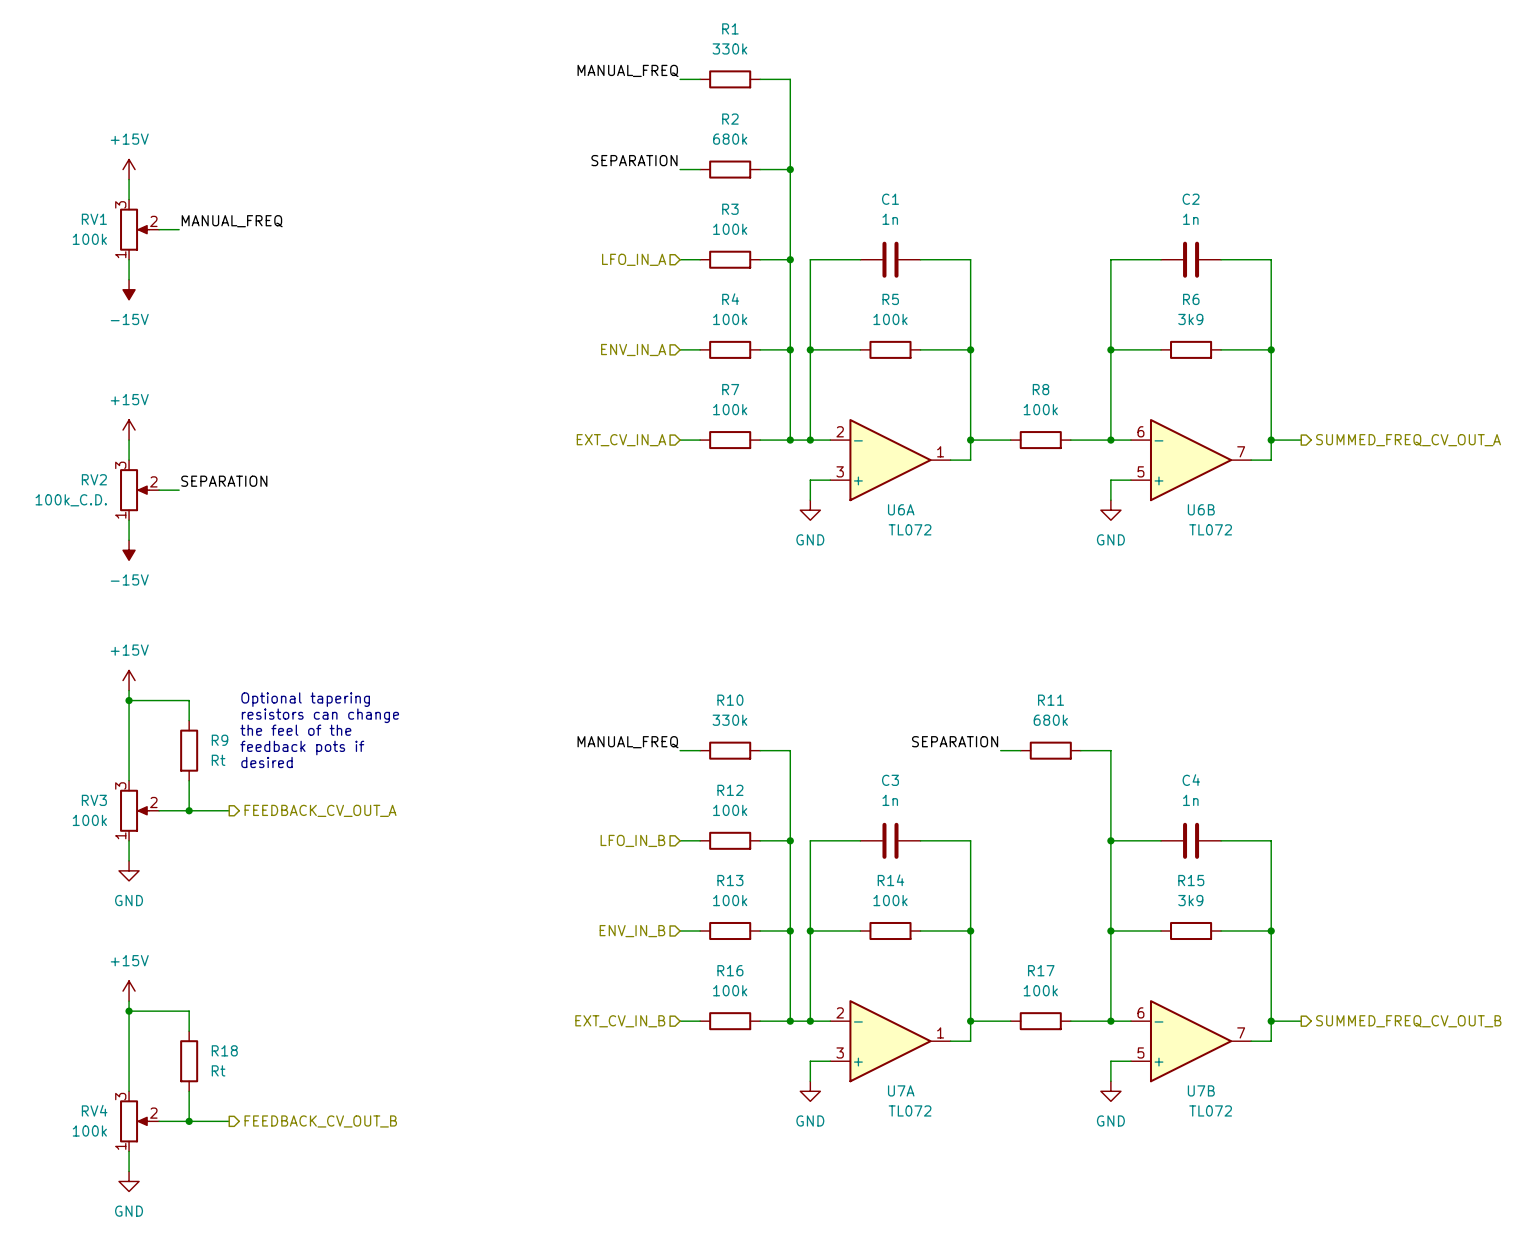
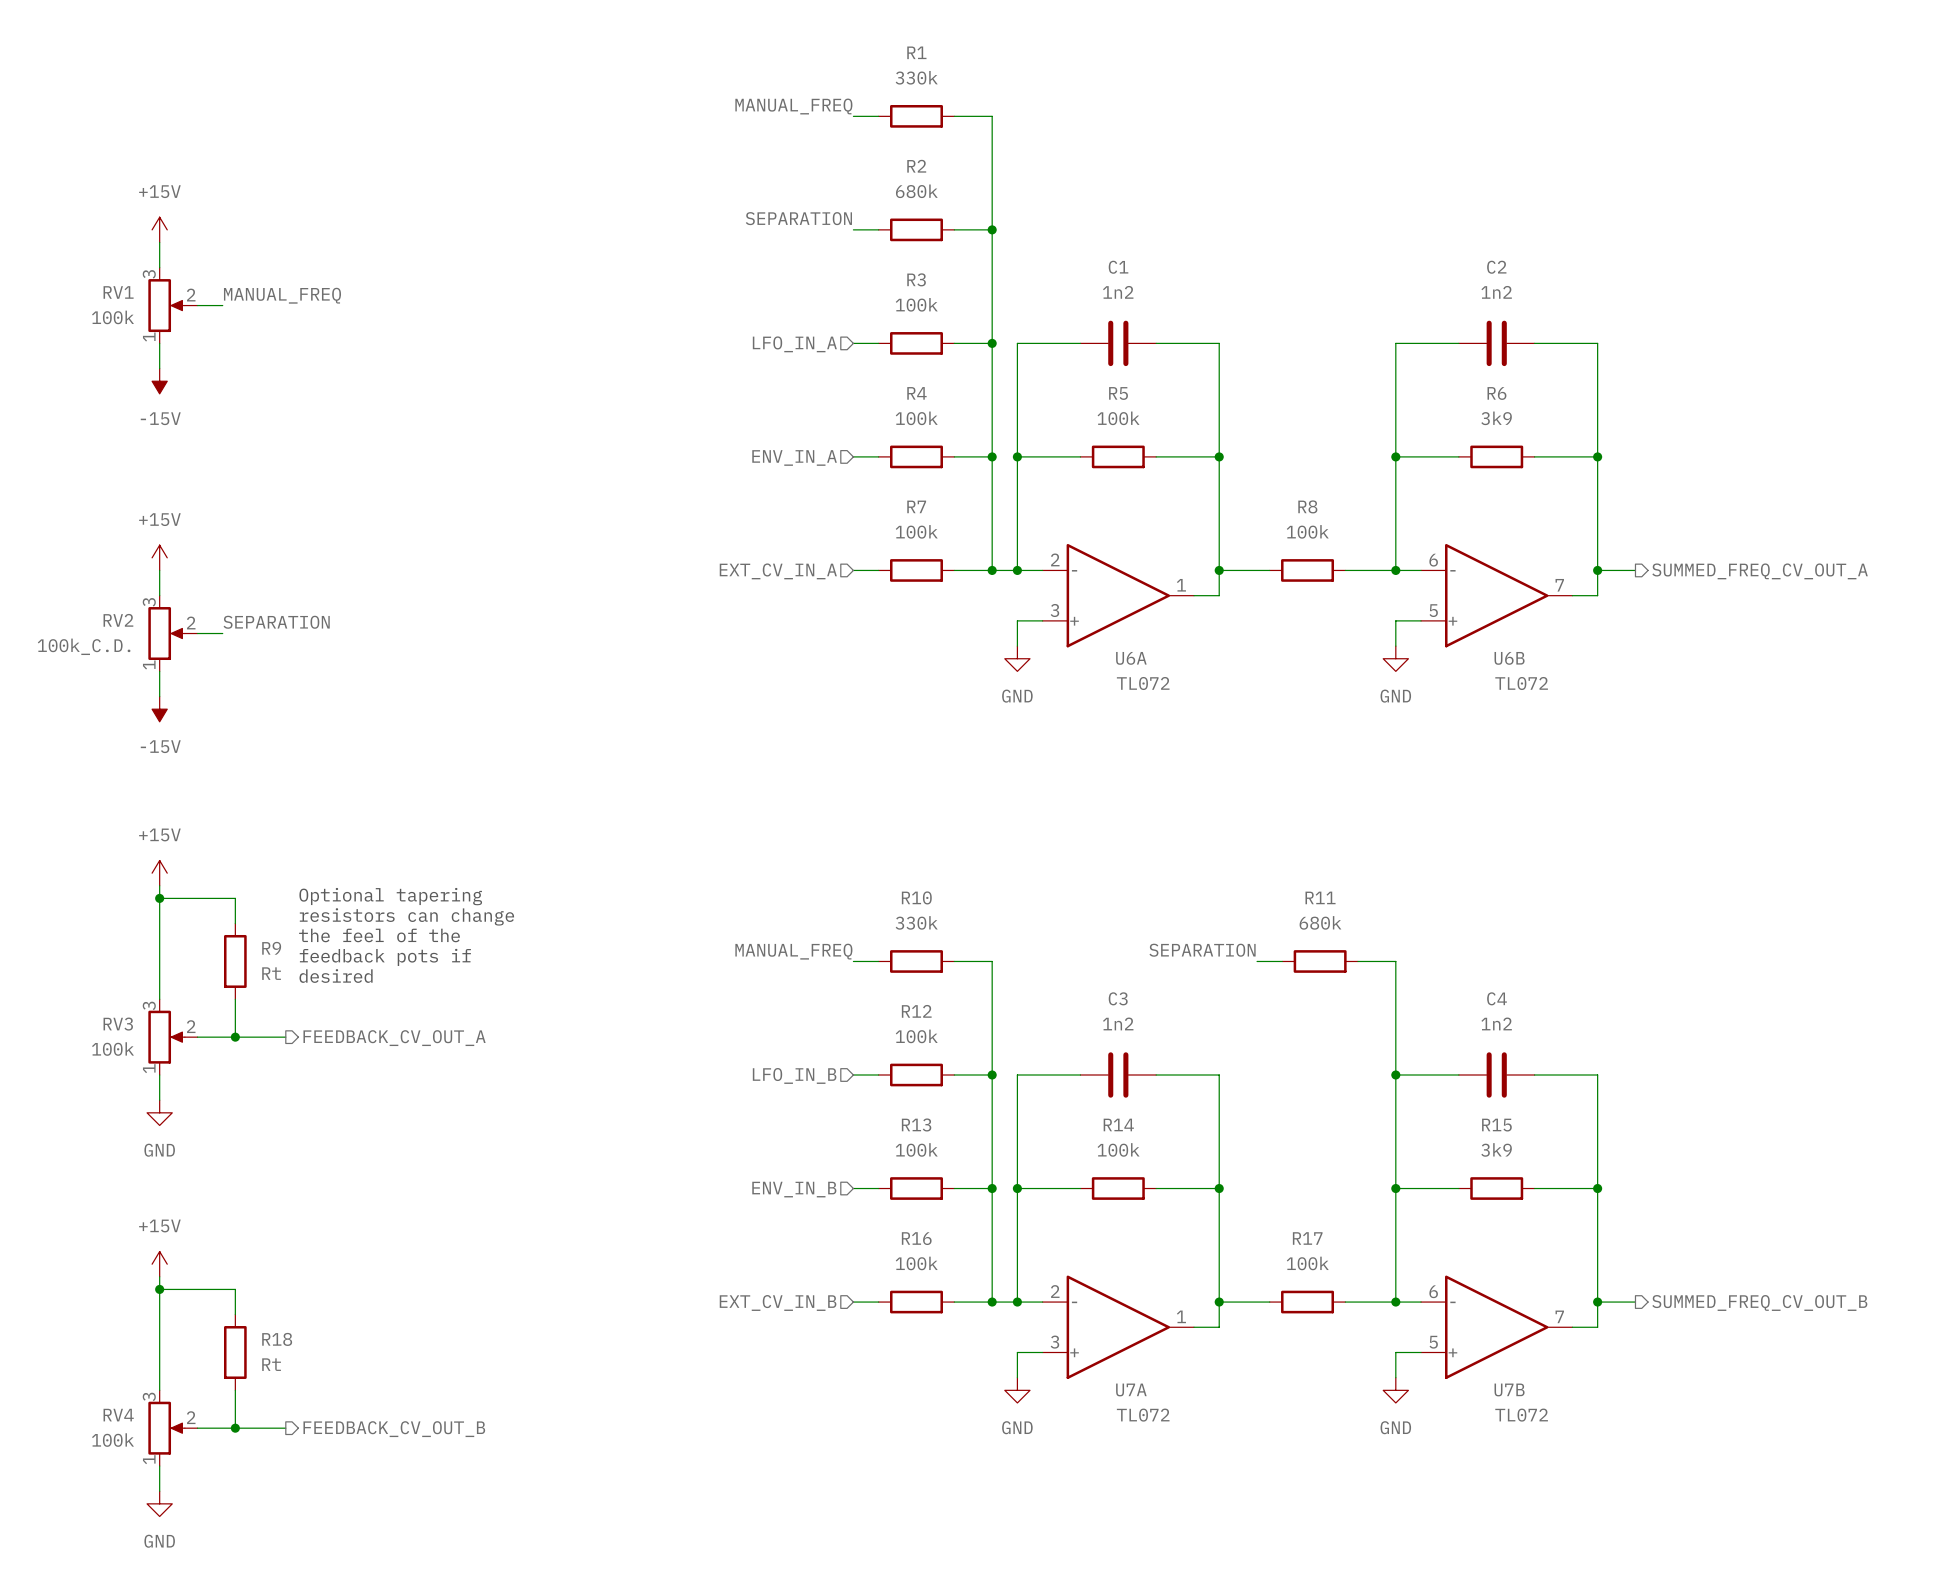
C1 value: 1n (890, 219) -> 1n2 (1118, 292)
C2 value: 1n (1190, 219) -> 1n2 (1496, 292)
C3 value: 1n (890, 800) -> 1n2 (1118, 1023)
C4 value: 1n (1190, 800) -> 1n2 (1496, 1023)

